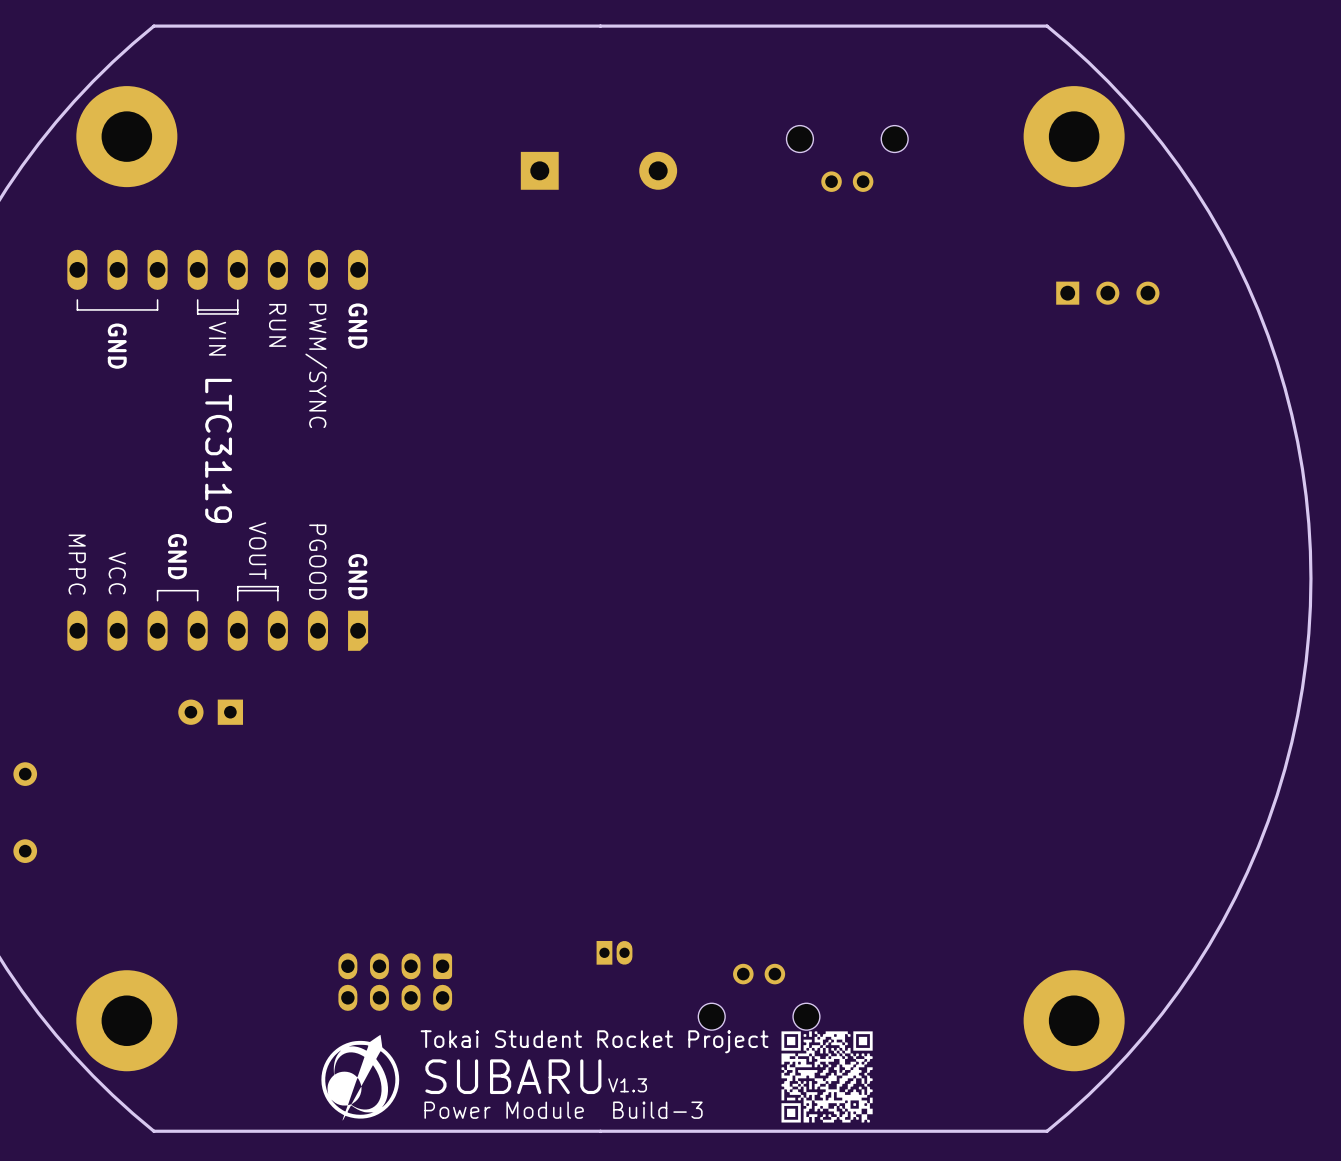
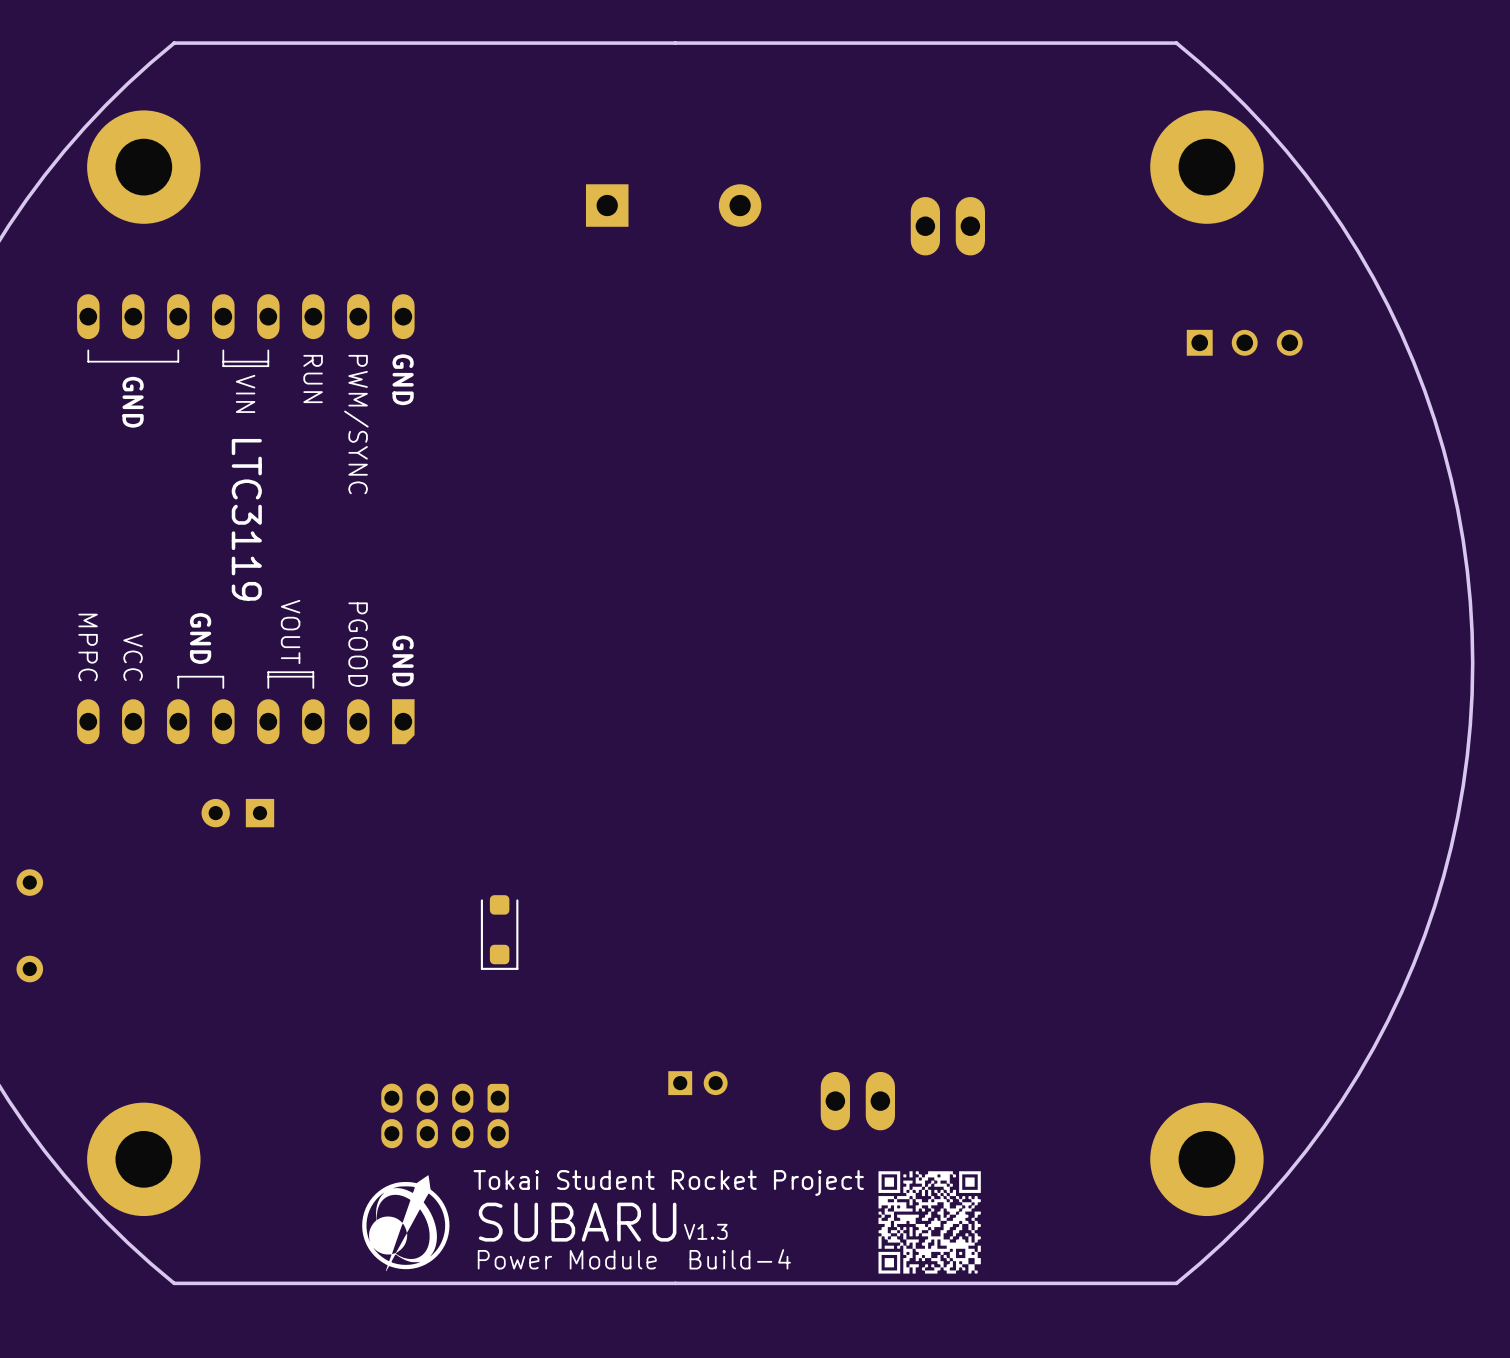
part: (847, 158) -> none
part: none -> (947, 226)
part: none -> (499, 932)
part footprint: [596, 940, 633, 965] -> [668, 1071, 728, 1096]
part: none -> (857, 1101)
part: (759, 996) -> none
text: Power Module Build-3 (563, 1110) -> Power Module Build-4 (634, 1259)

